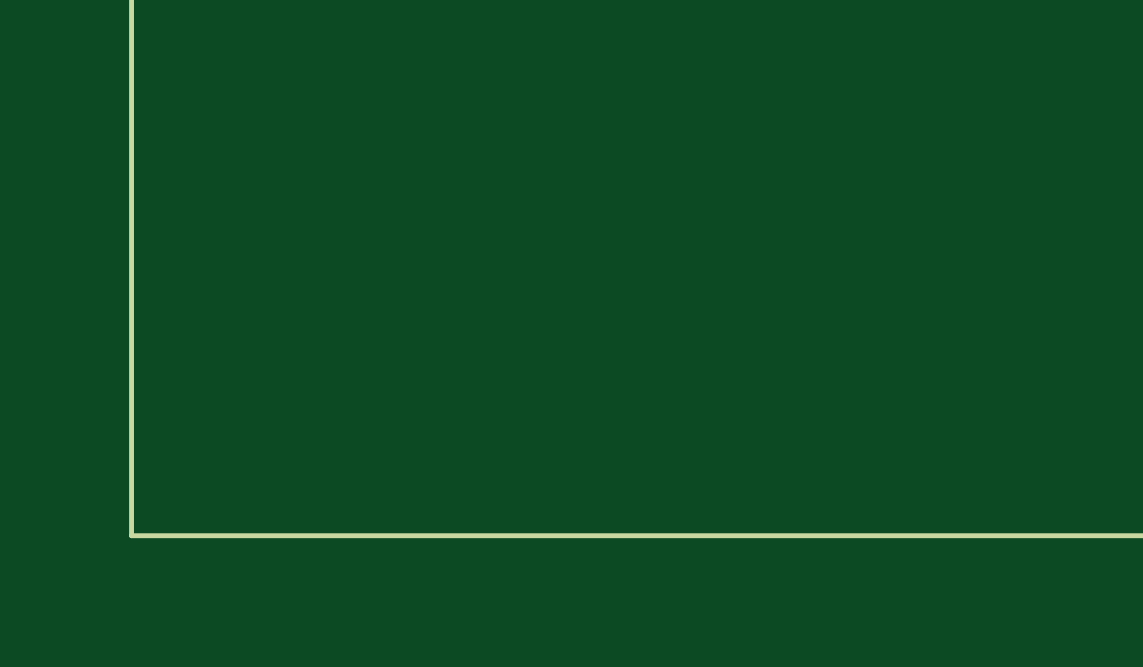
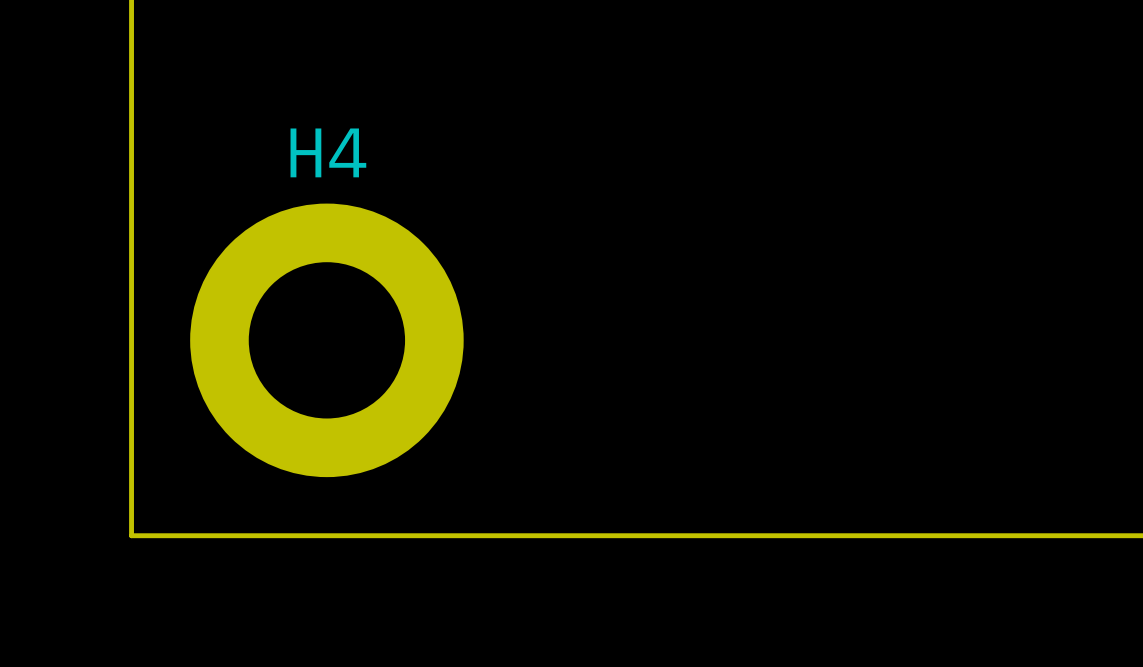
H4: none -> (326, 340)

